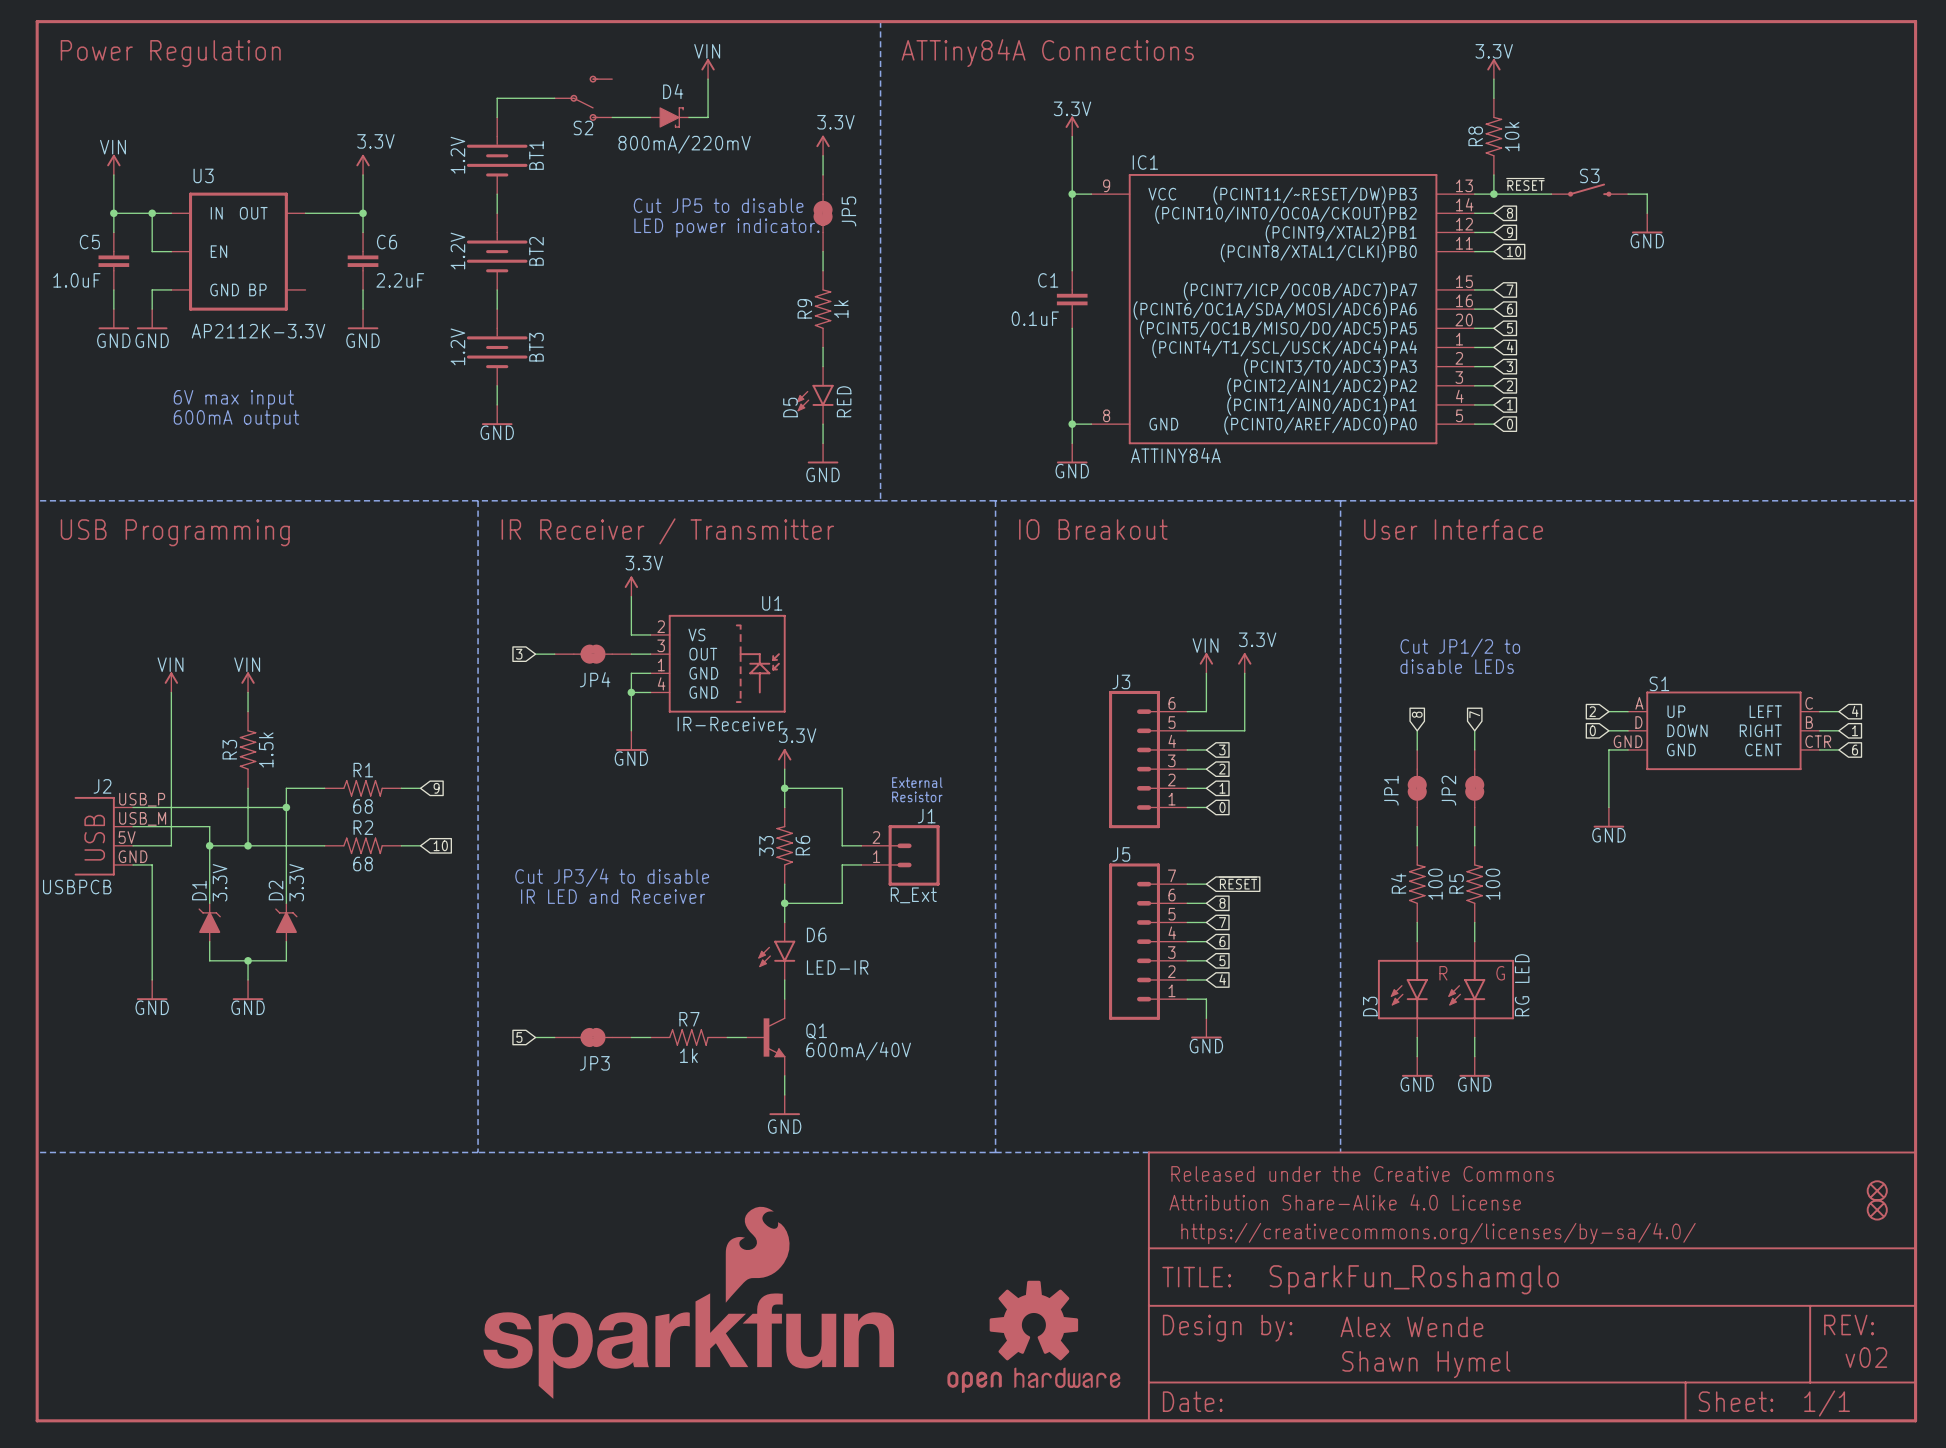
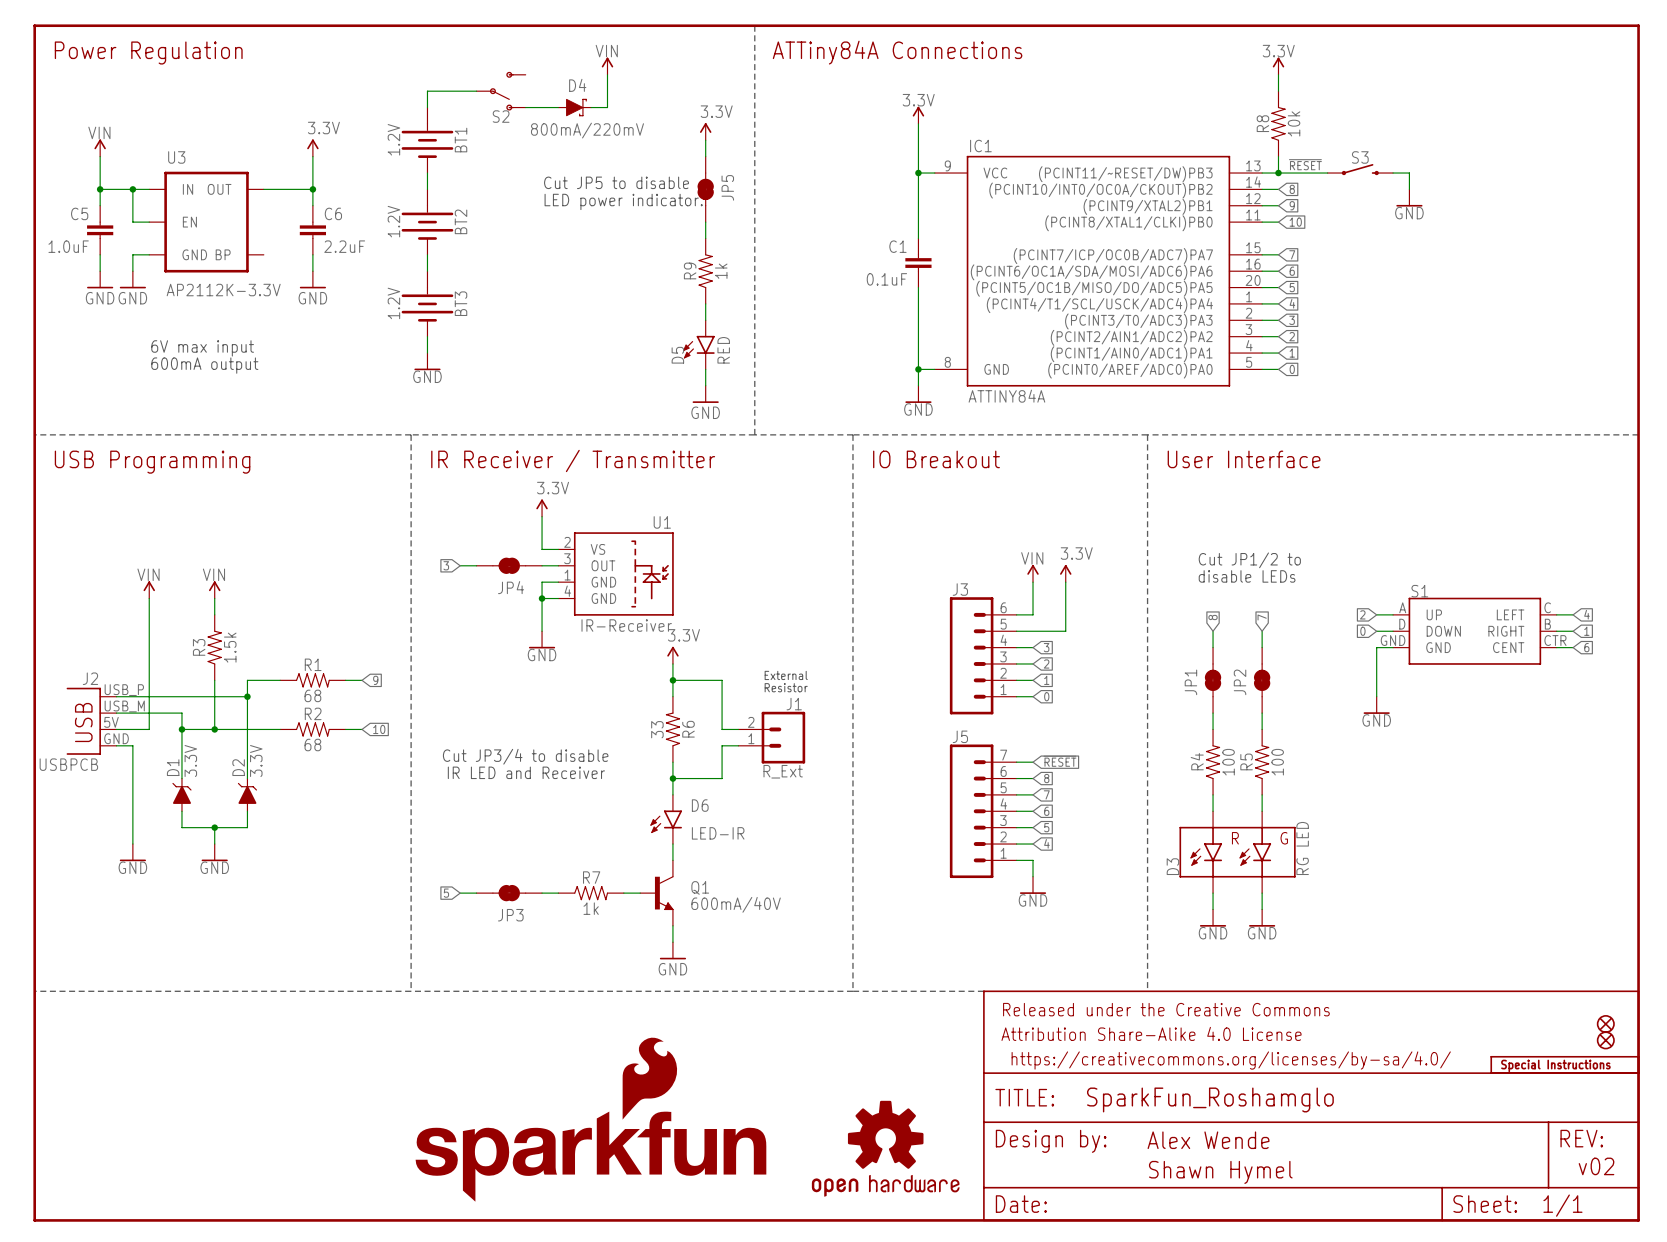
part: none -> (1564, 1064)

